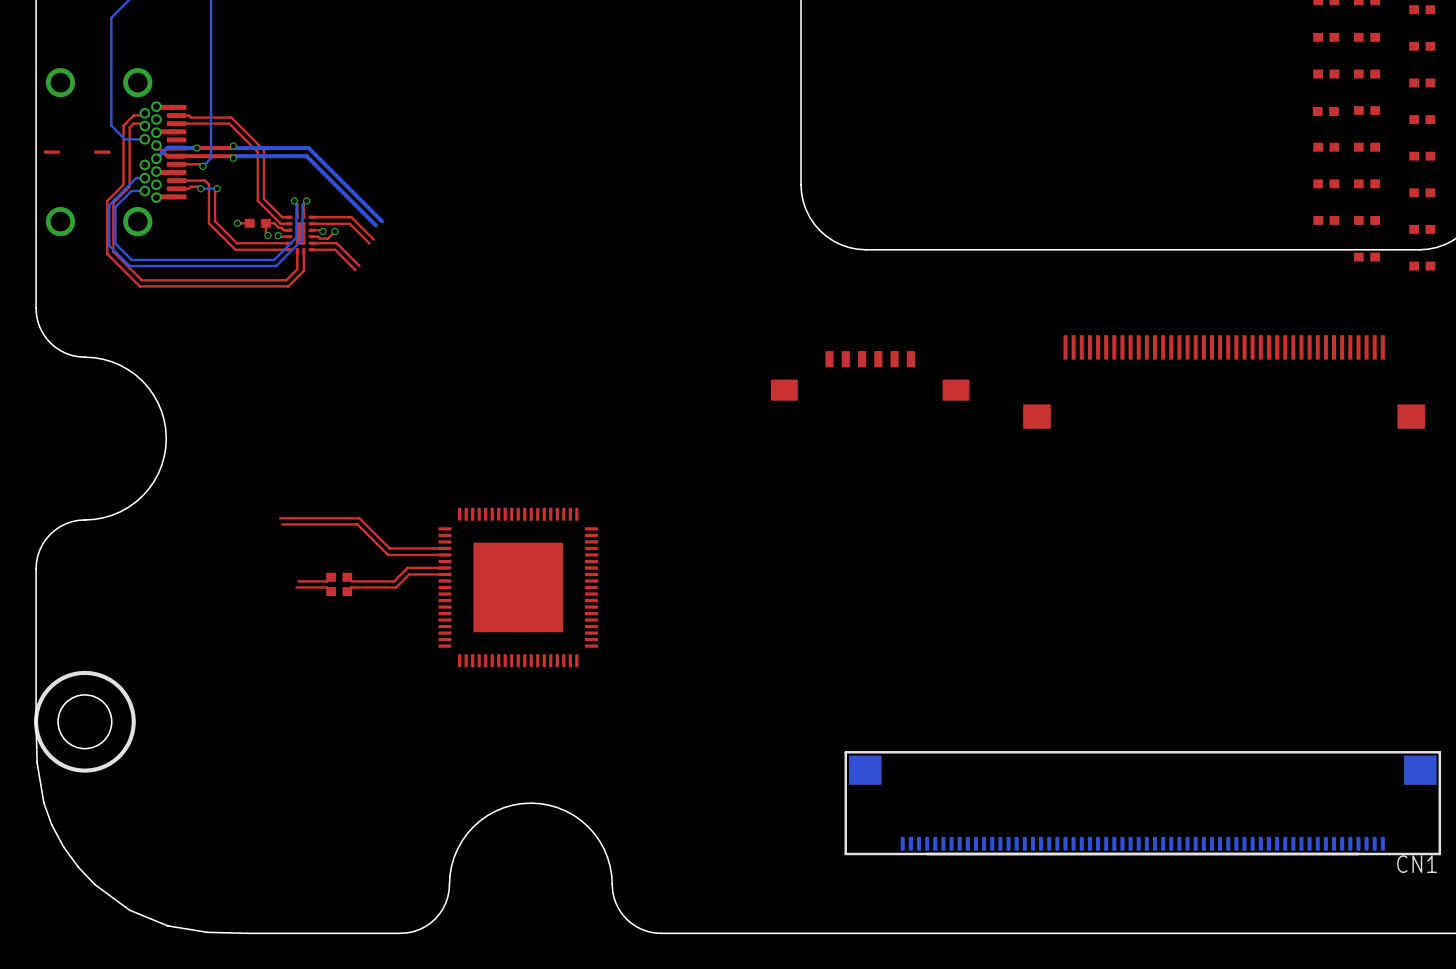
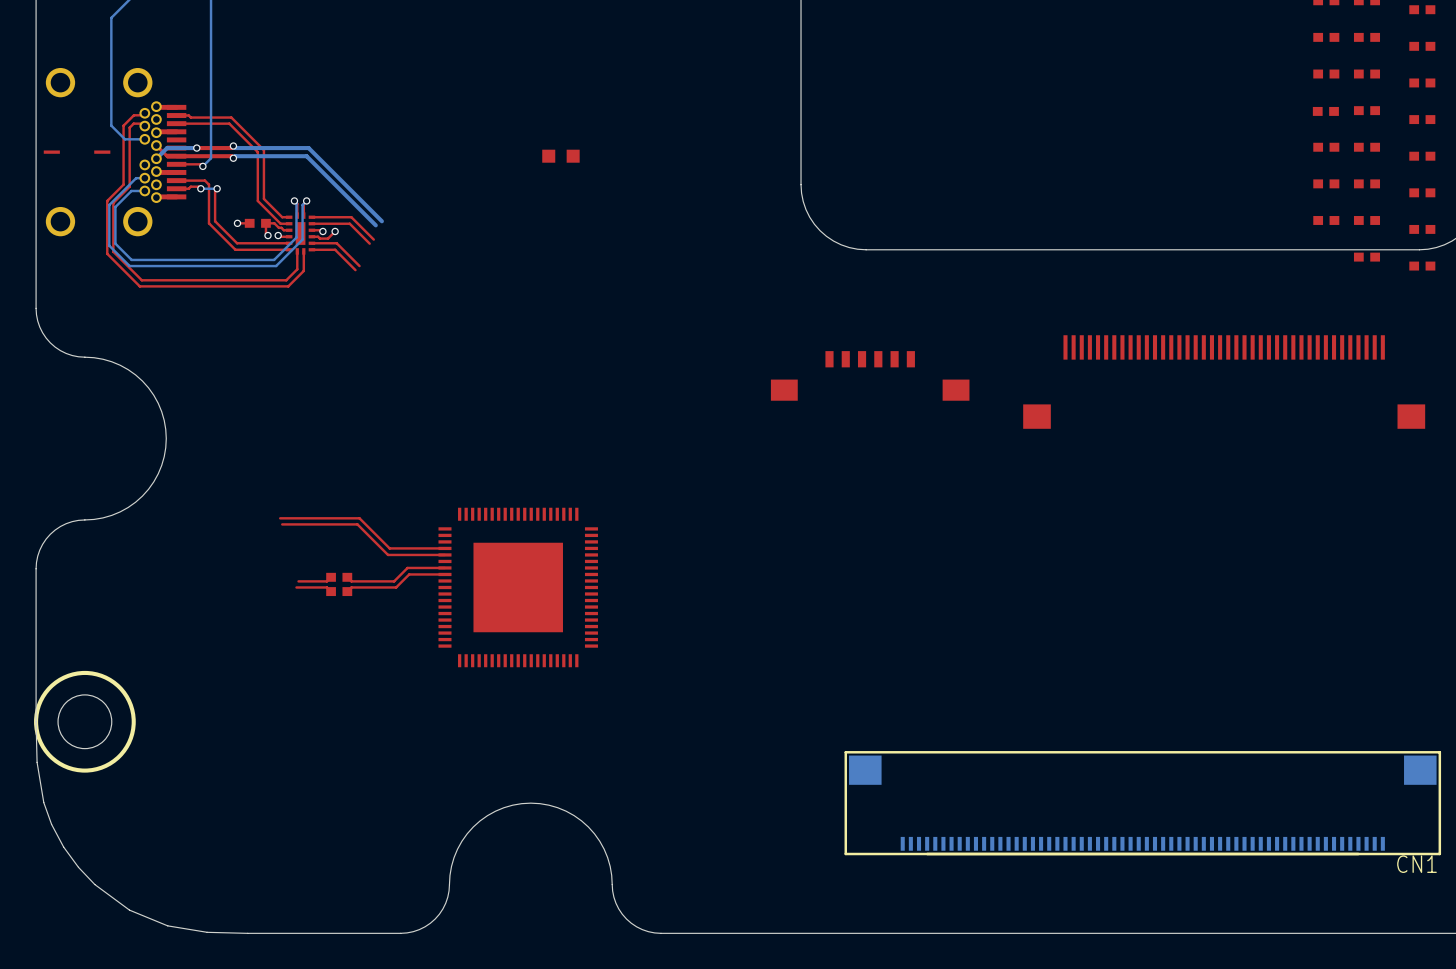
part: none -> (560, 156)

